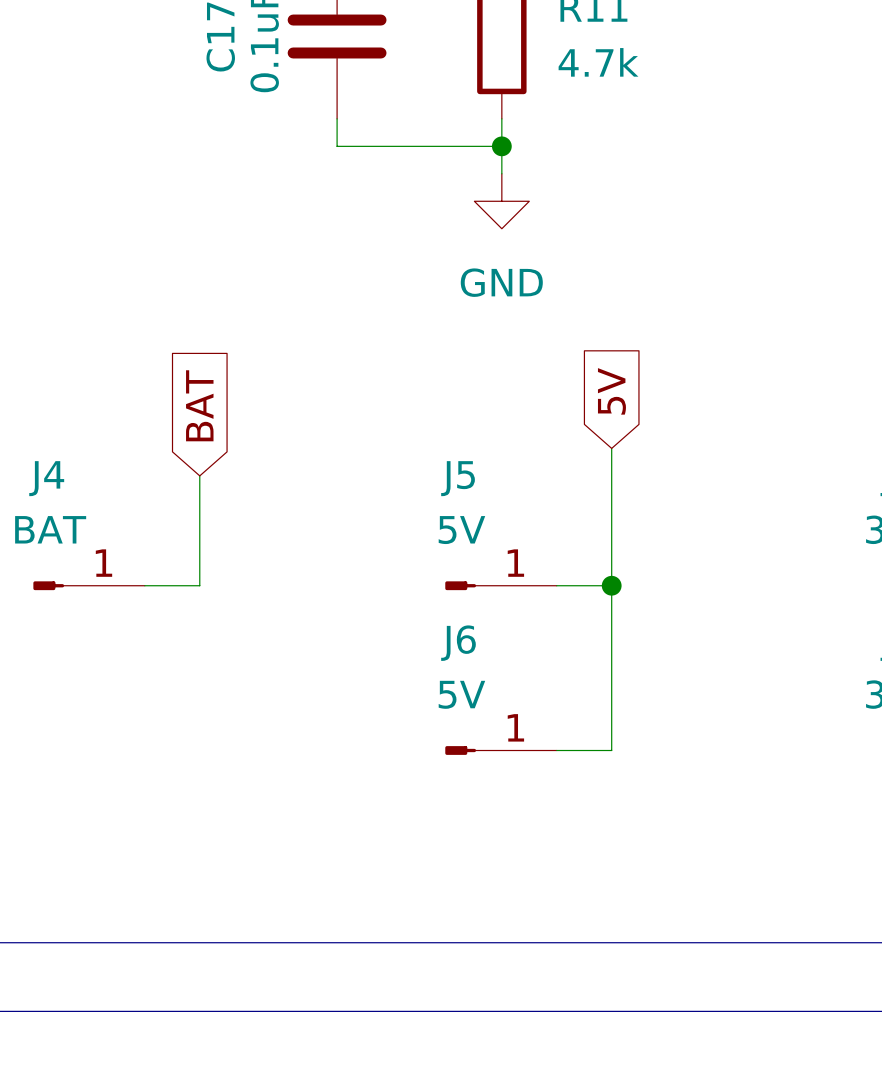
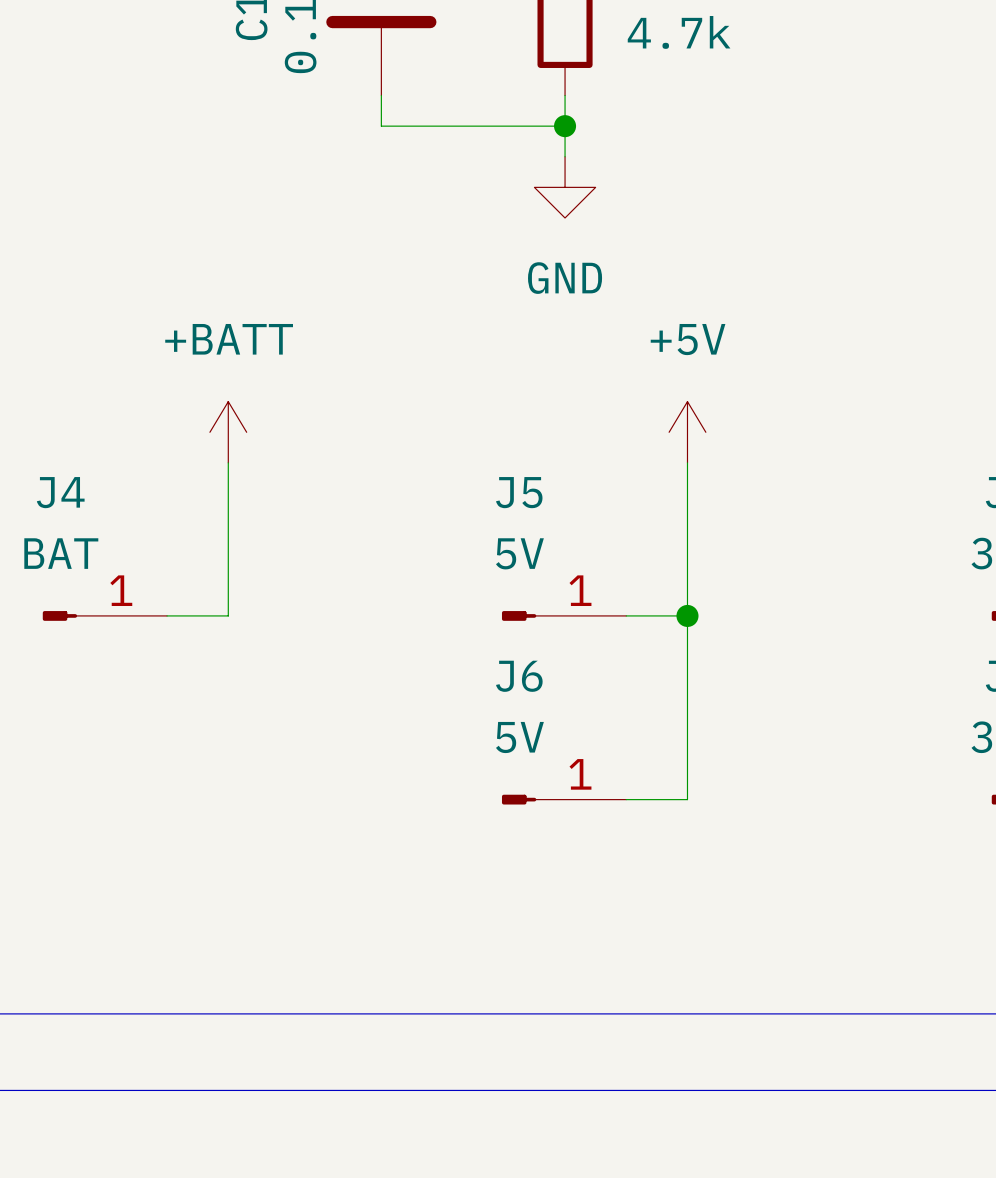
global label: 5V (611, 391) -> none
global label: BAT (199, 405) -> none
power symbol: none -> +BATT (228, 432)
power symbol: none -> +5V (687, 432)
wire: none -> (228, 462) (228, 493)

